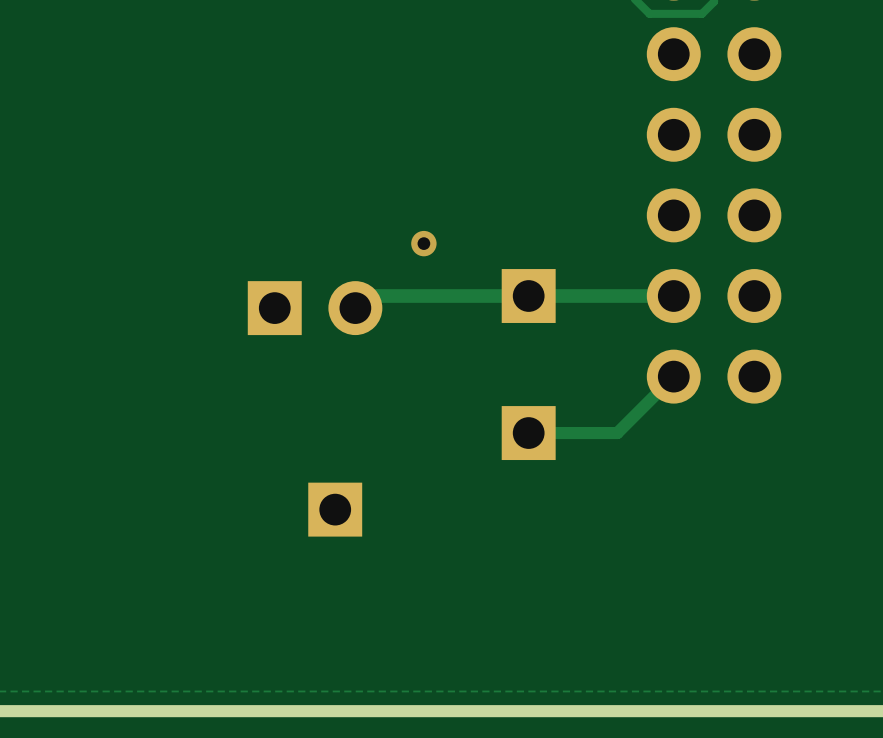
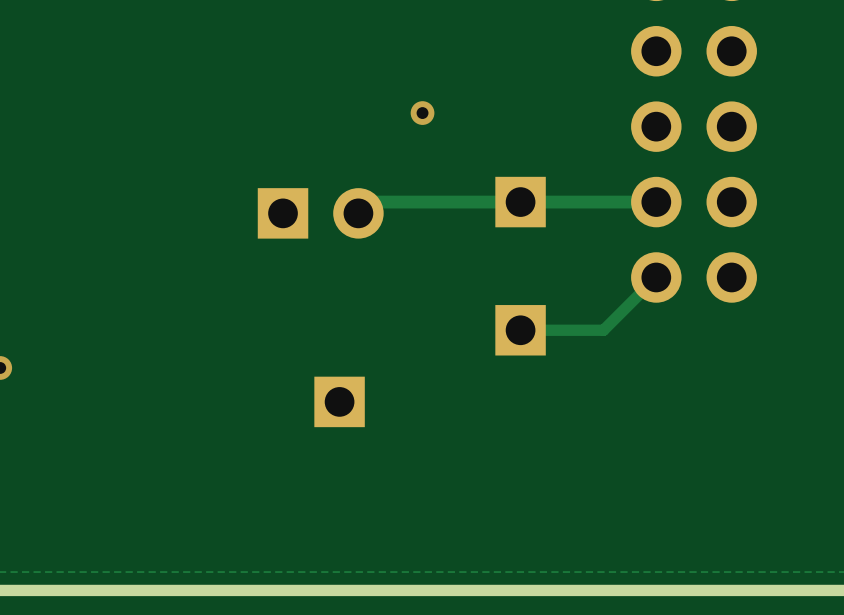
via position: (423, 243) -> (422, 113)

